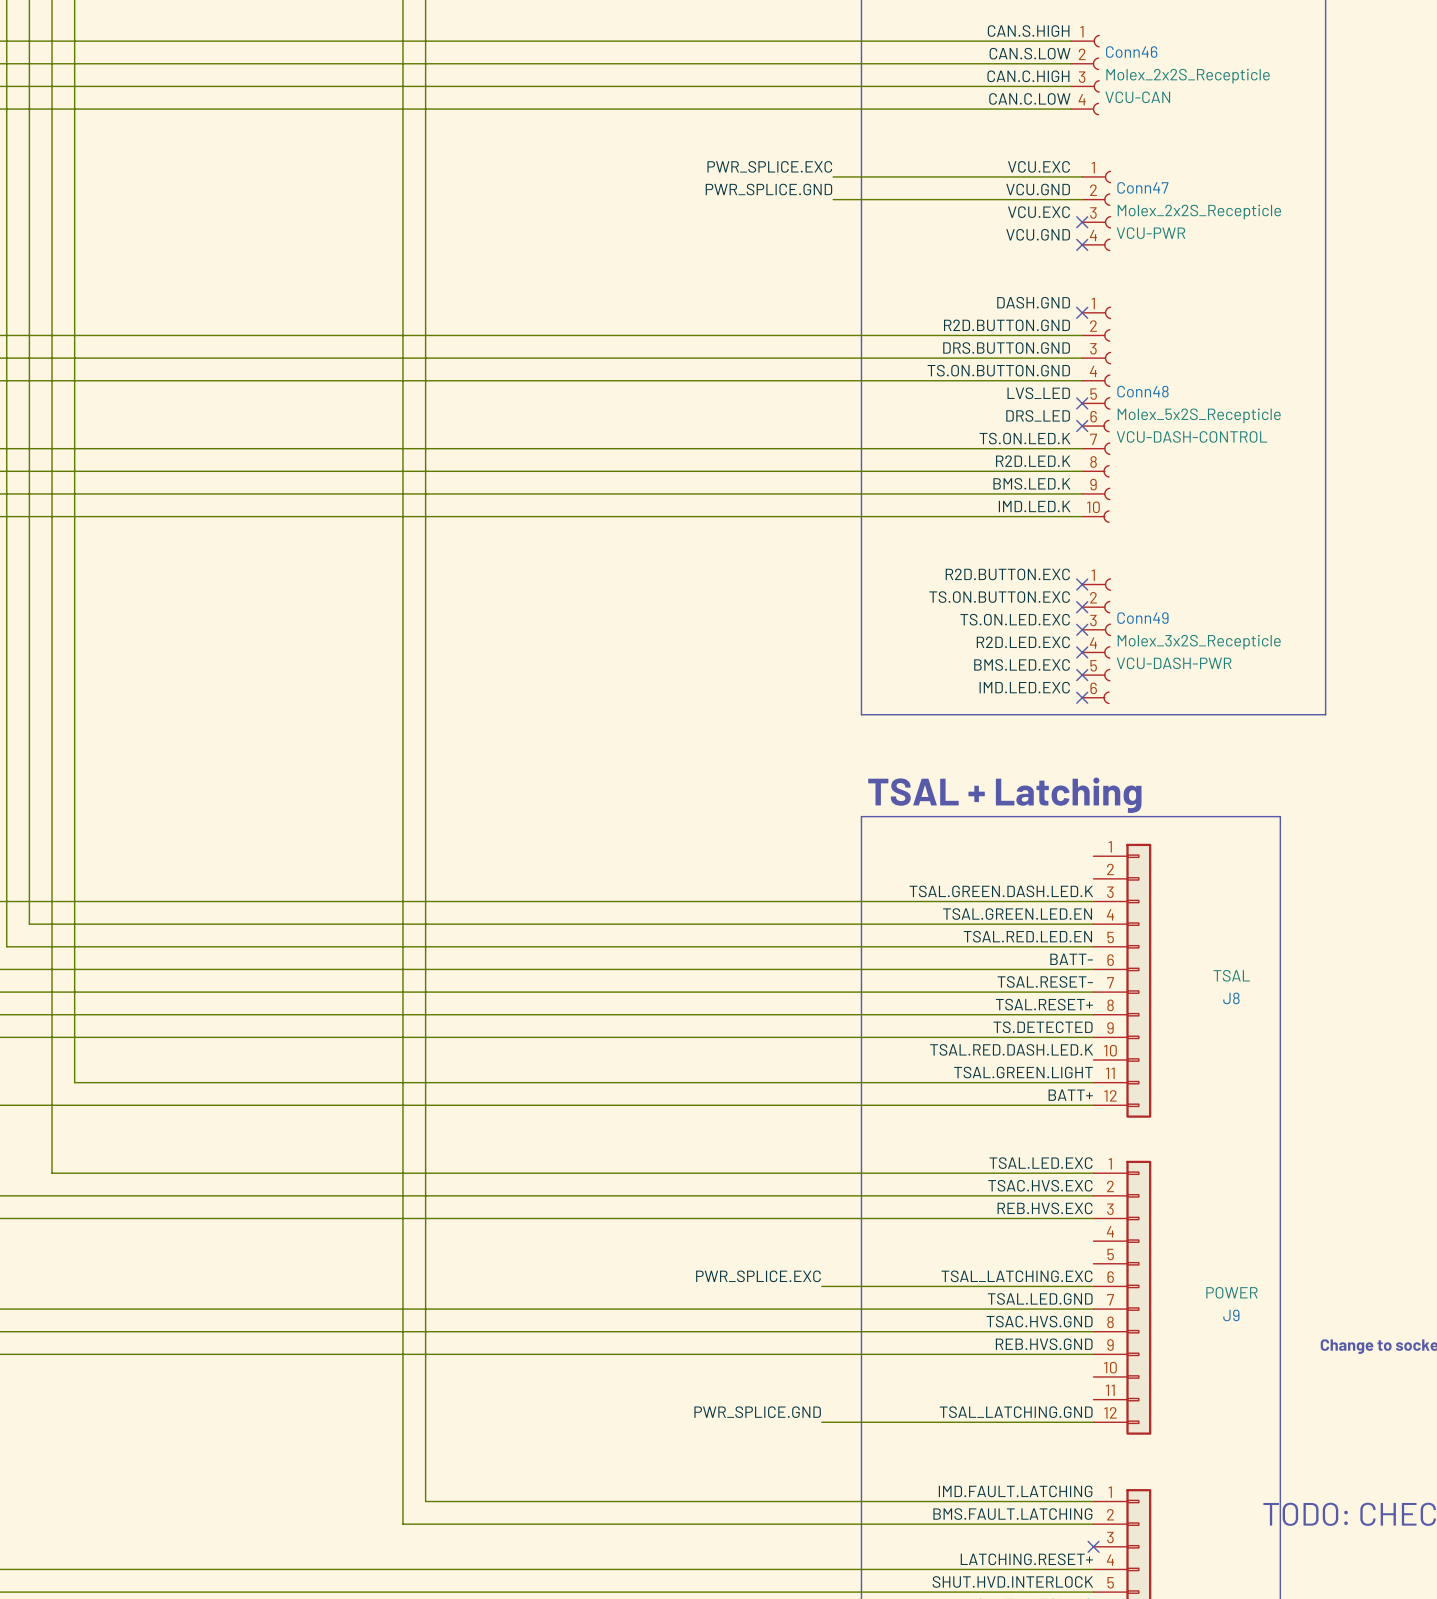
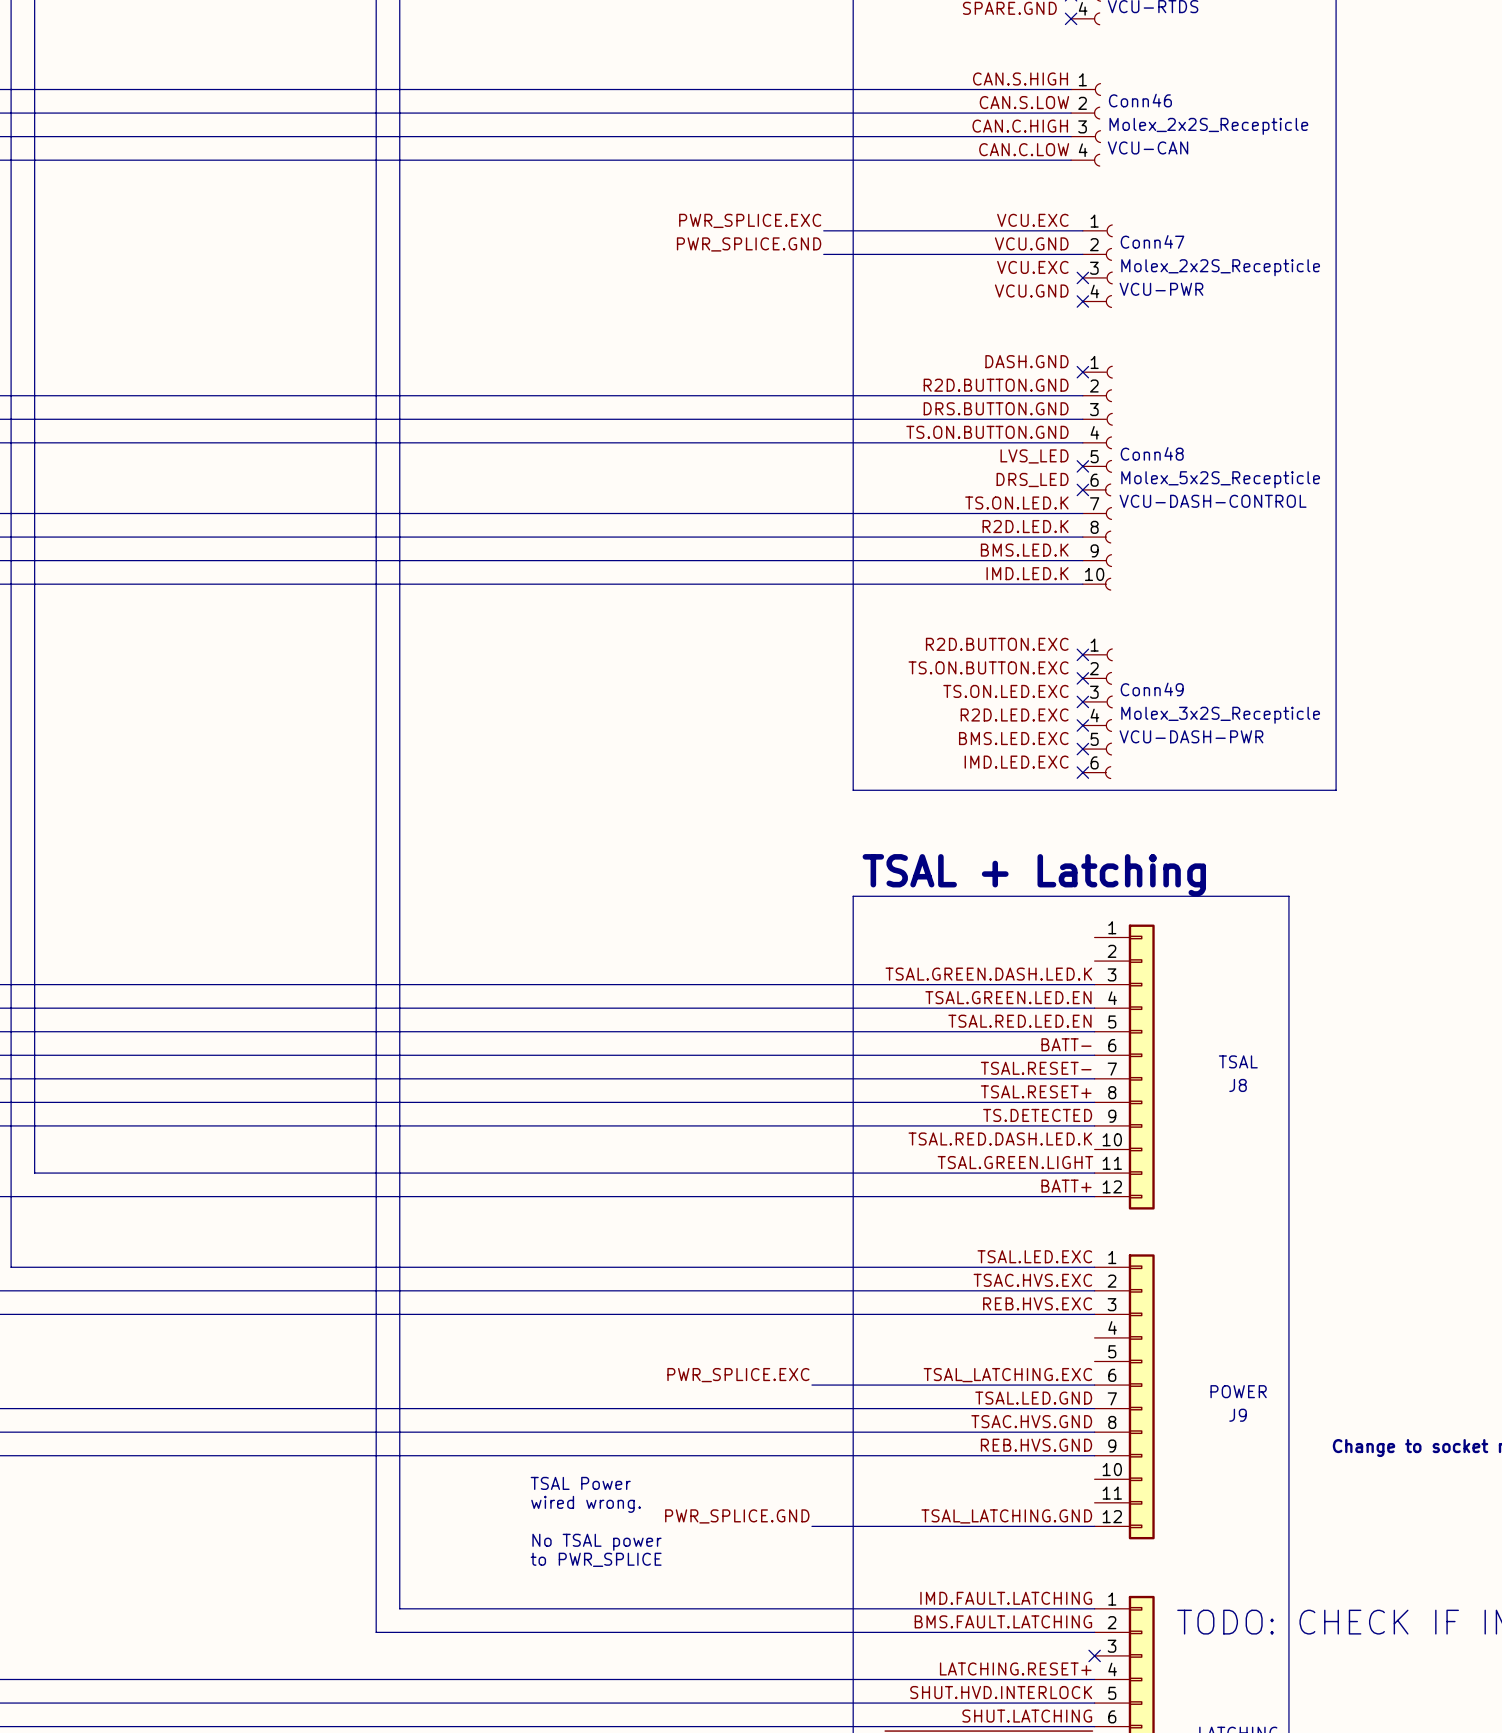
text: none -> TSAL Power (580, 1483)
text: none -> wired wrong. (586, 1504)
text: none -> No TSAL power (596, 1542)
text: none -> to PWR_SPLICE (596, 1559)

